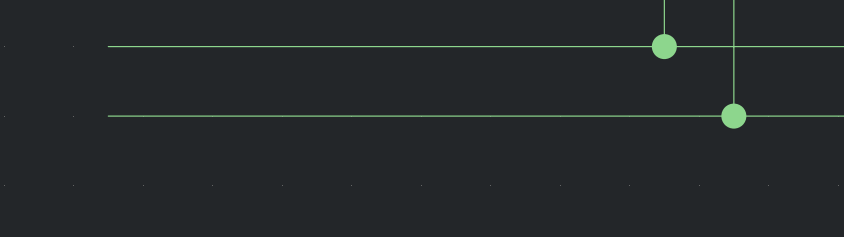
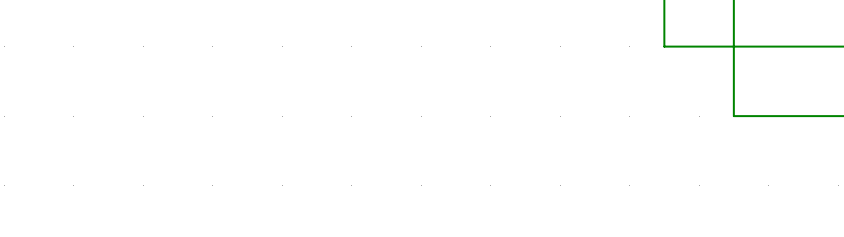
wire: (108, 46) (664, 46) -> none
junction: (664, 46) -> none
wire: (108, 116) (733, 116) -> none
junction: (733, 116) -> none

